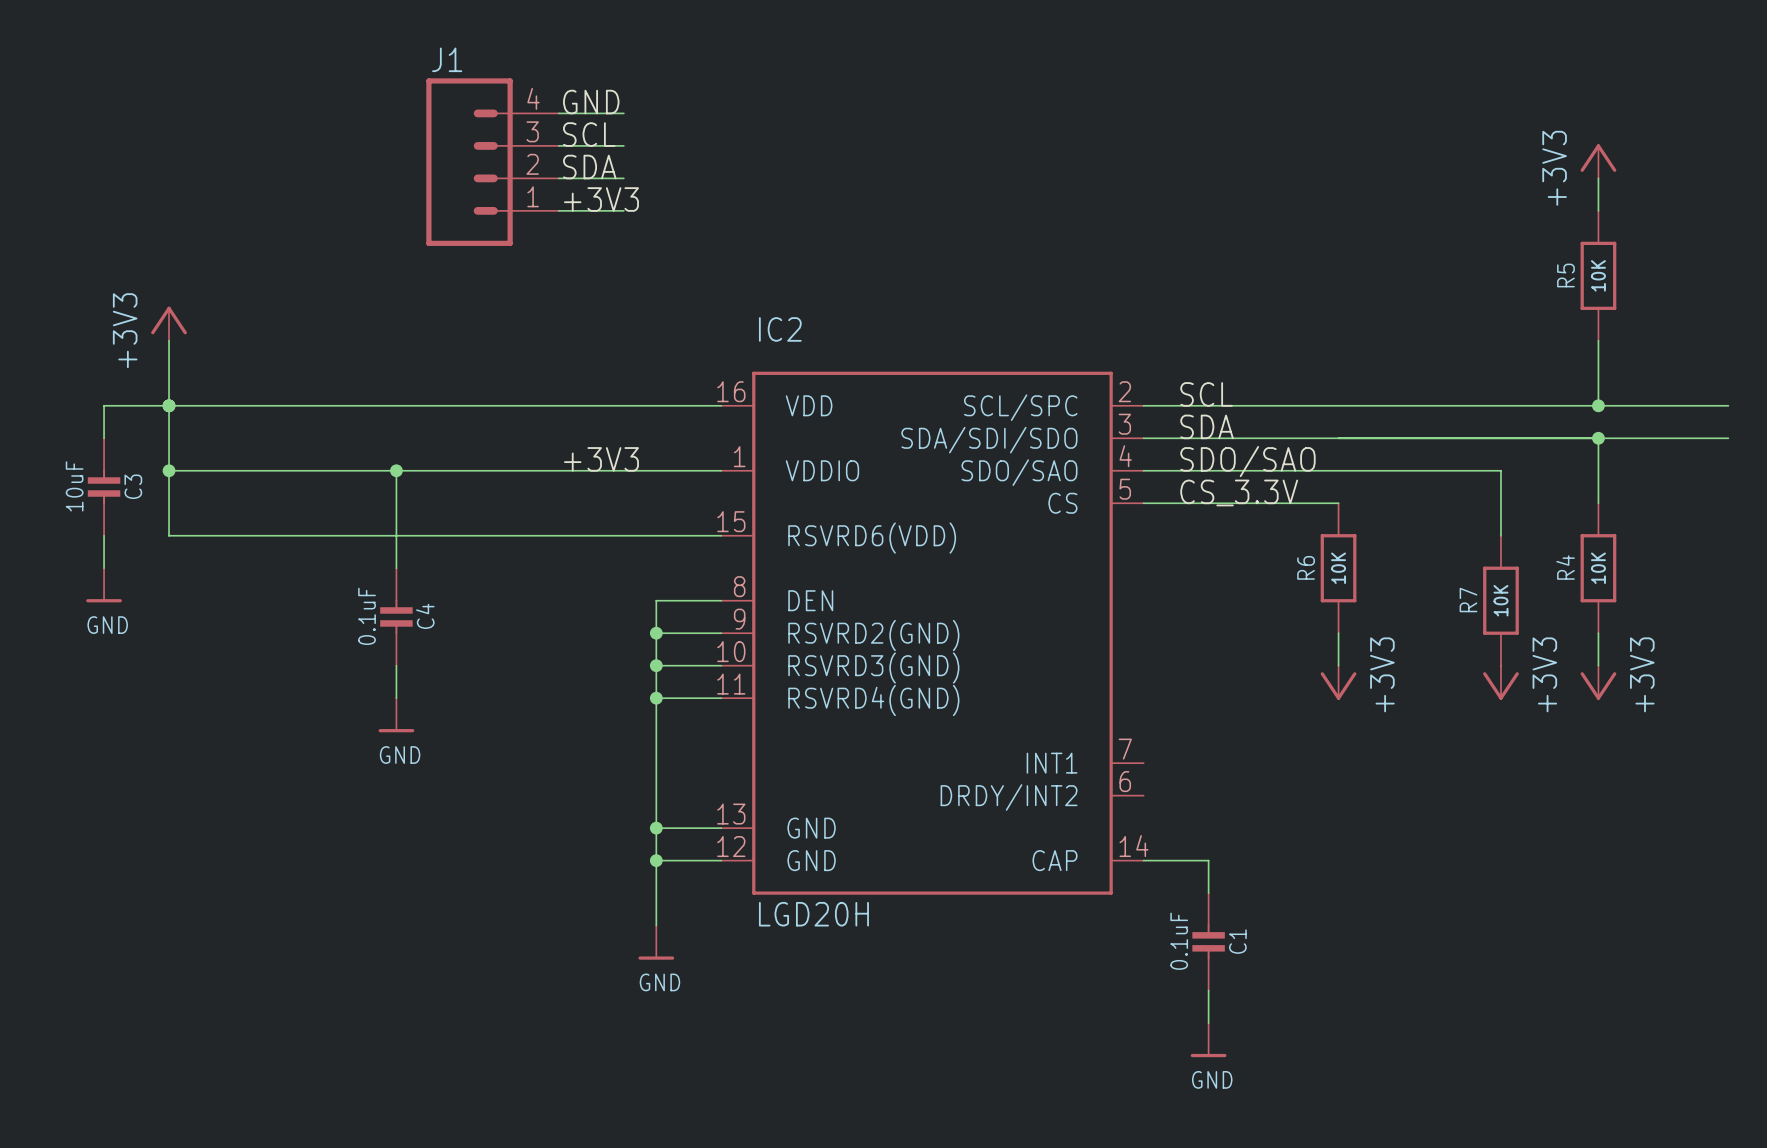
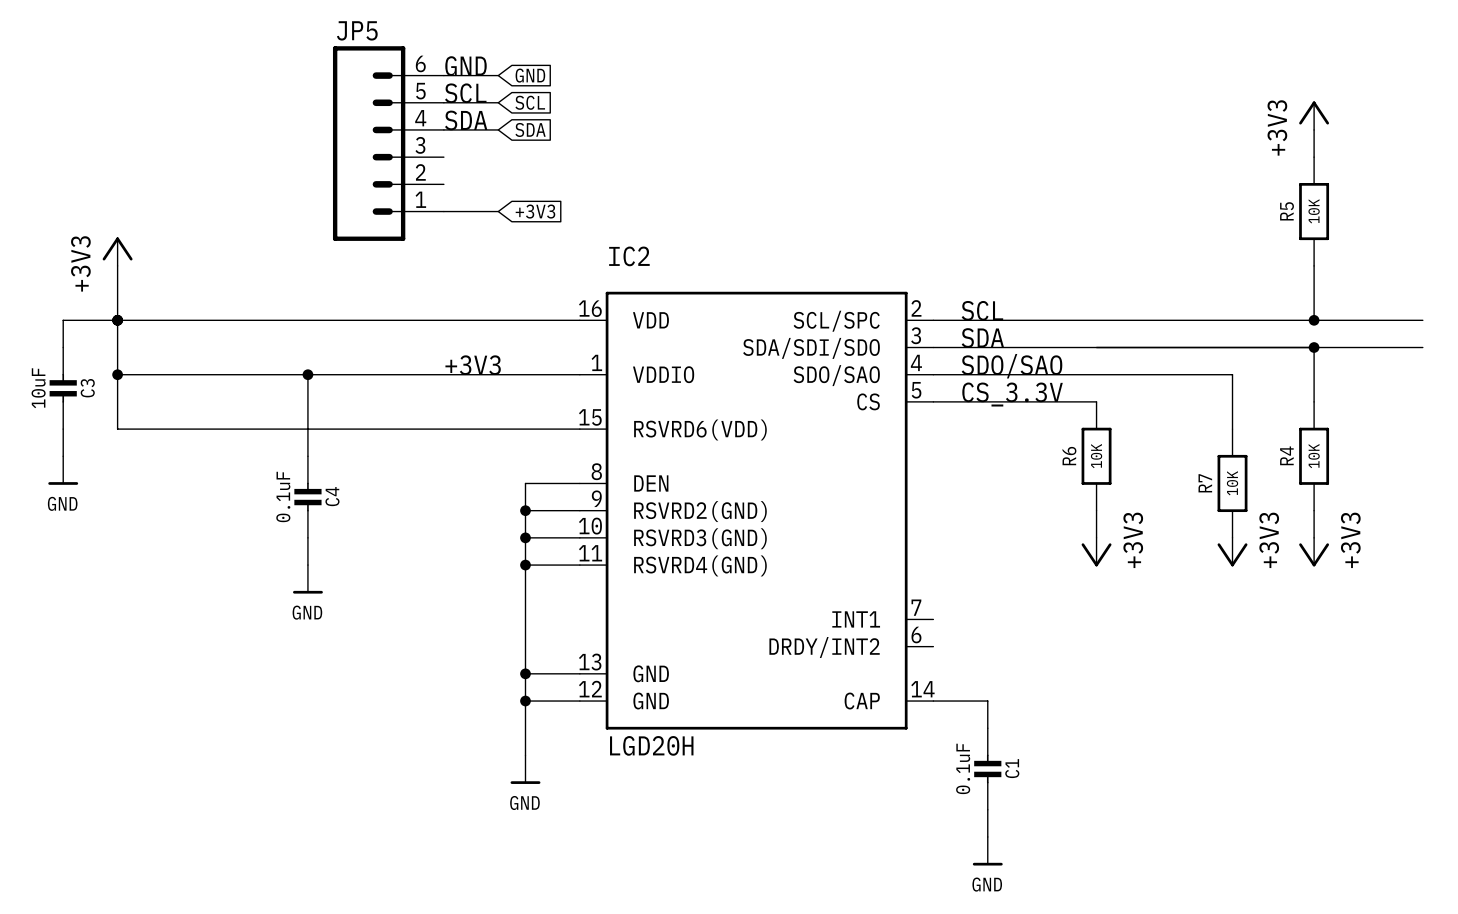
global label: none -> GND (530, 75)
global label: none -> SCL (530, 102)
J1: (492, 162) -> none
global label: none -> SDA (530, 129)
JP5: none -> (388, 143)
label: +3V3 (601, 199) -> none
wire: (558, 210) (623, 210) -> (443, 211) (498, 211)
global label: none -> +3V3 (535, 211)

